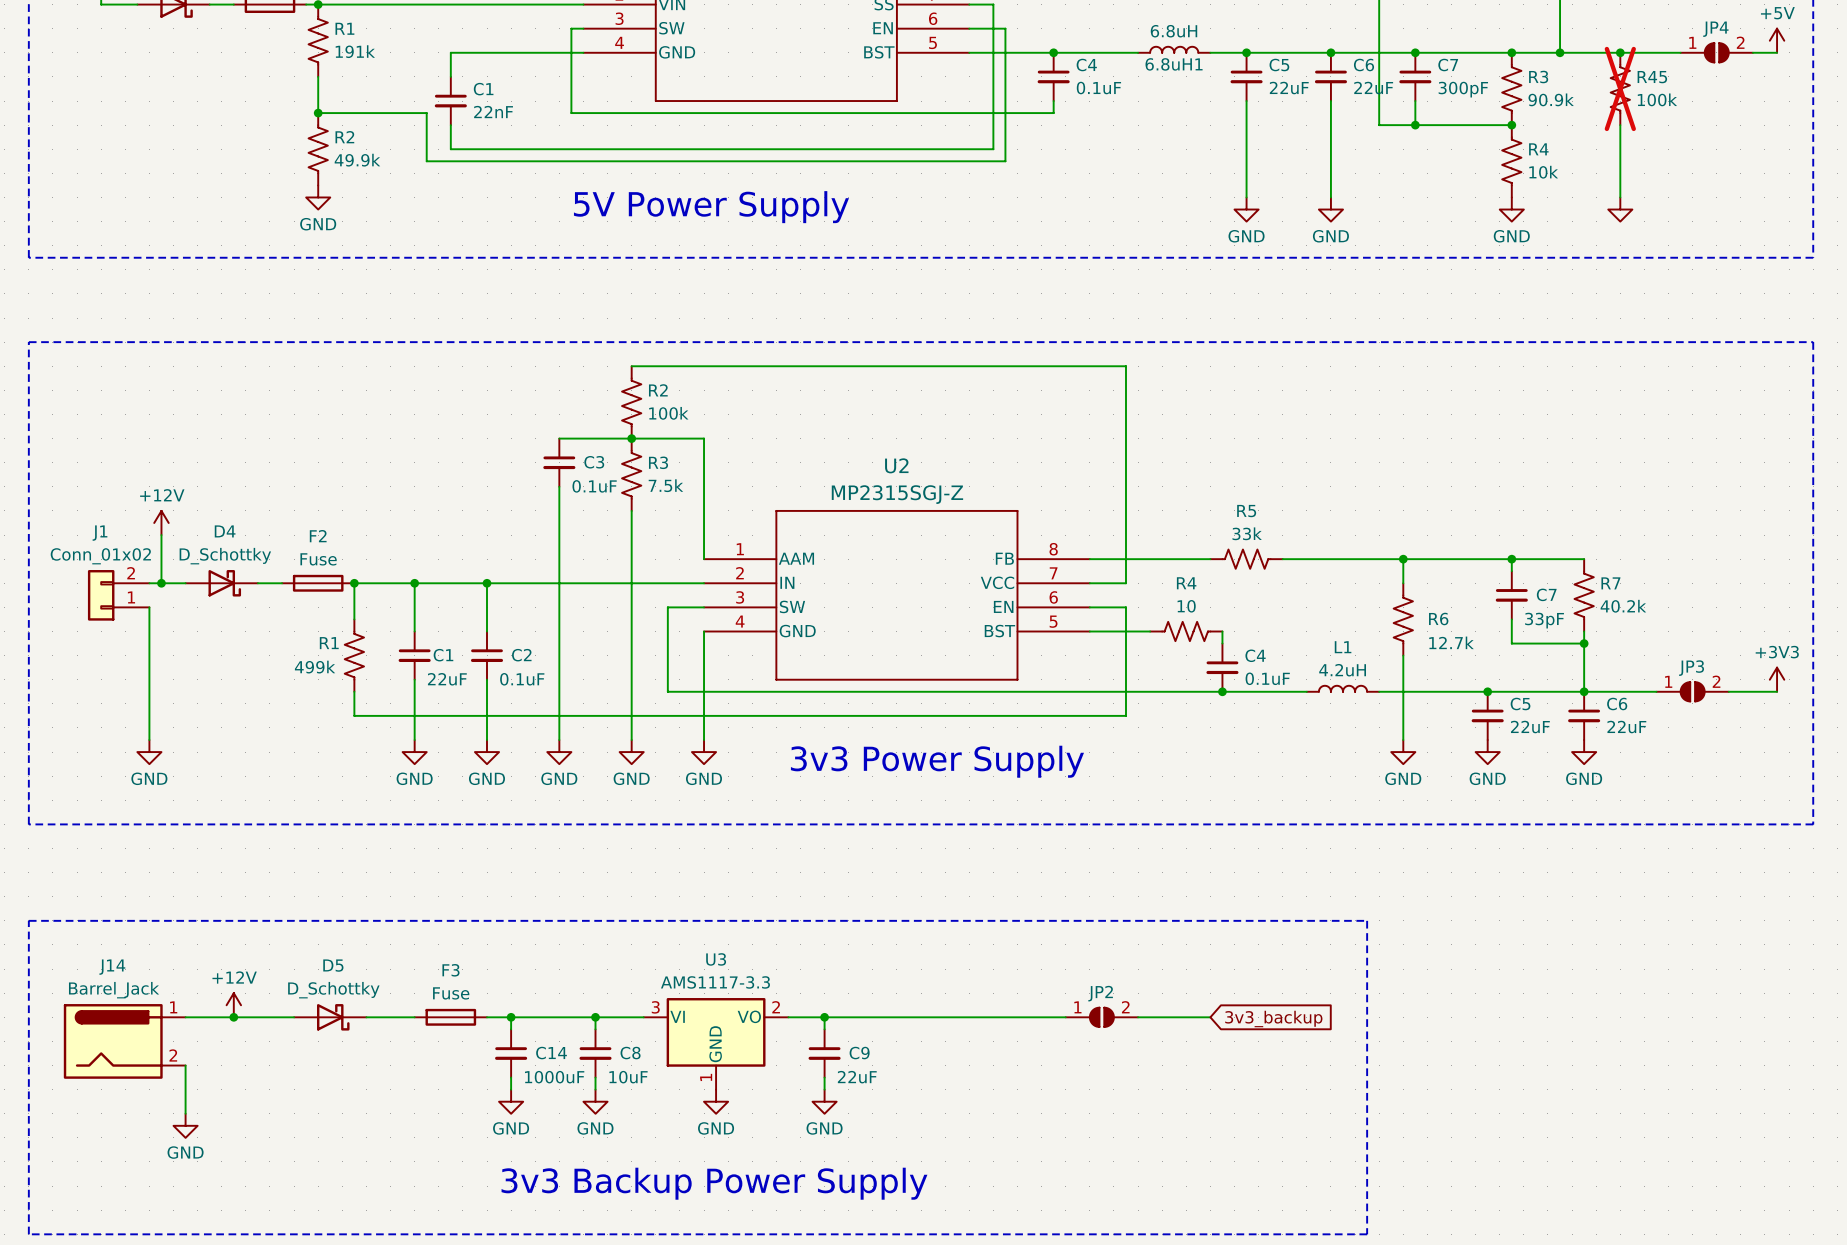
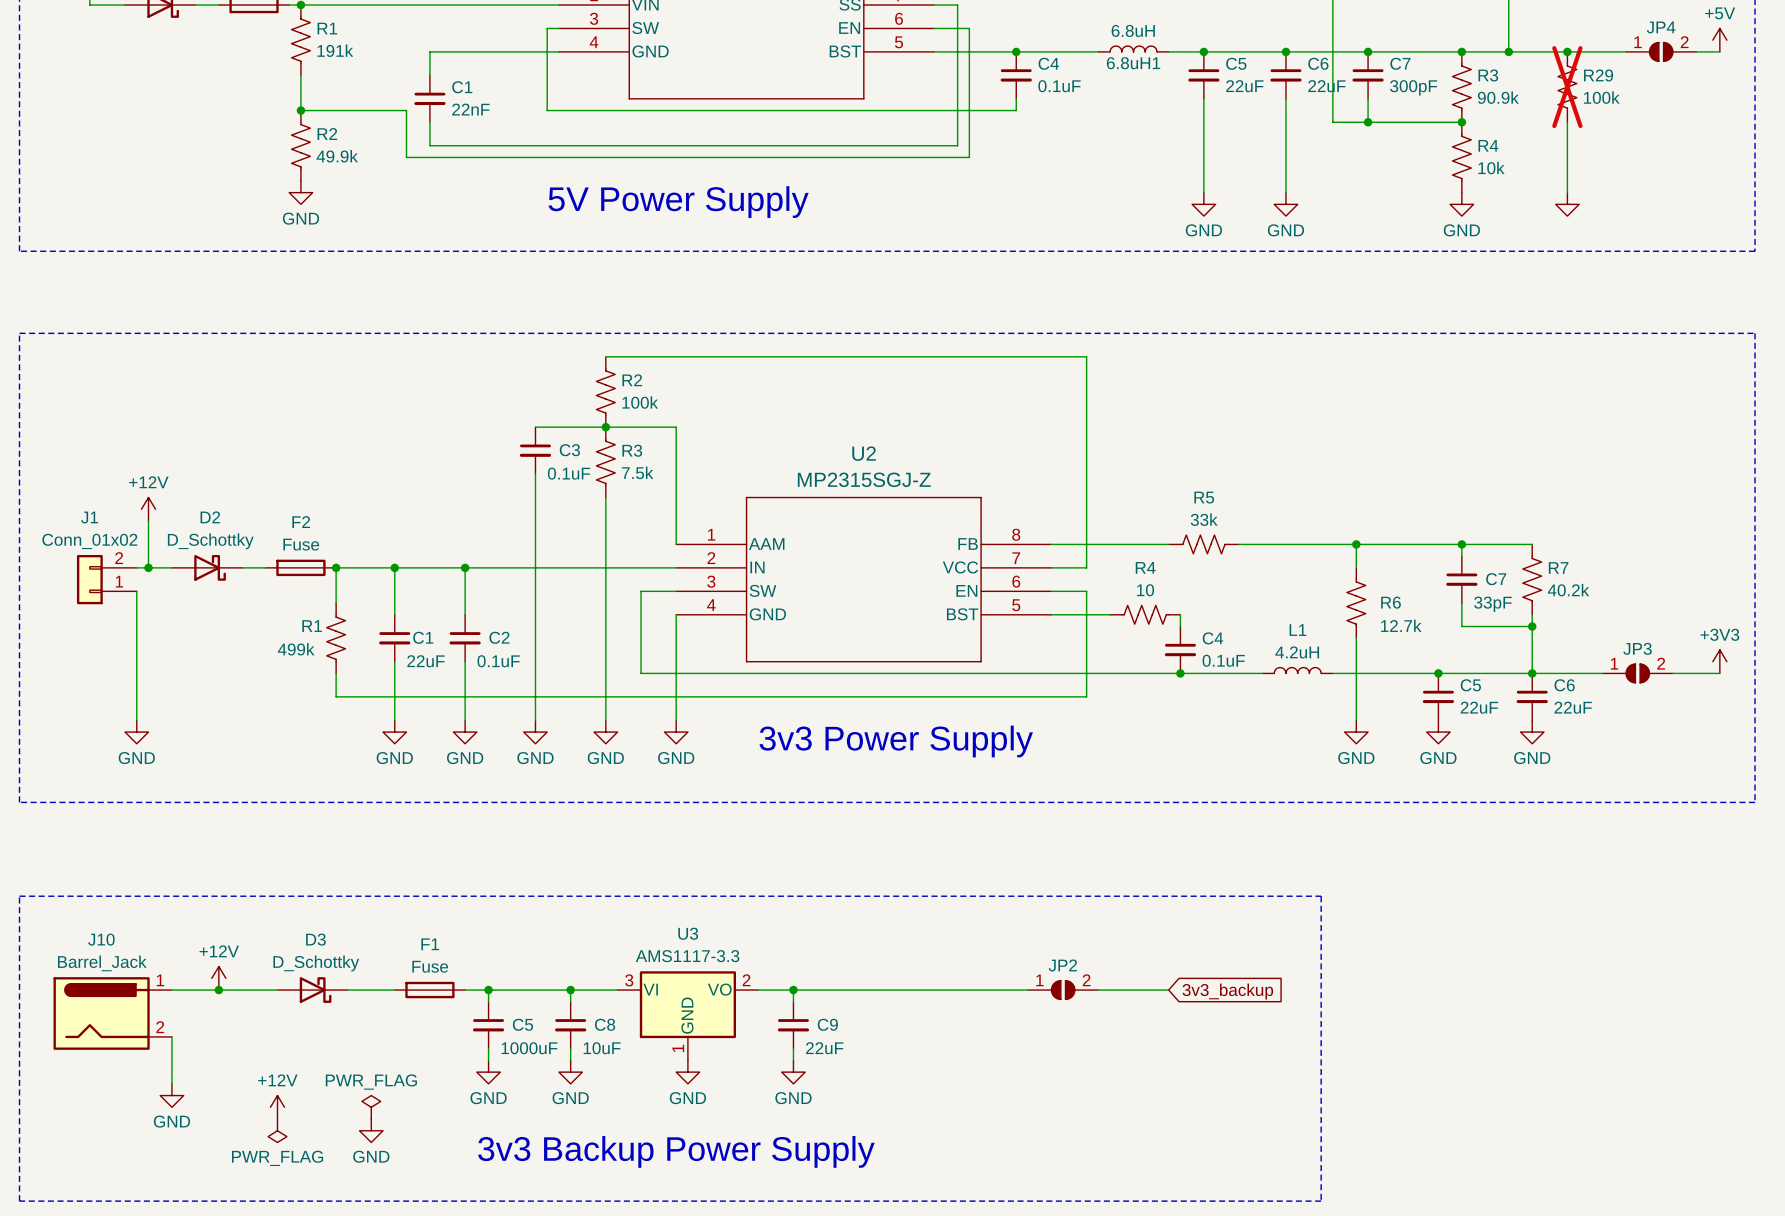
R45 name: R45 (1652, 77) -> R29 (1598, 75)
D4 name: D4 (225, 531) -> D2 (210, 517)
D5 name: D5 (333, 965) -> D3 (315, 939)
J14 name: J14 (112, 967) -> J10 (101, 939)
F3 name: F3 (450, 970) -> F1 (430, 944)
C14 name: C14 (551, 1053) -> C5 (522, 1024)
power symbol: none -> +12V (277, 1107)
power symbol: none -> PWR_FLAG (371, 1107)
power symbol: none -> PWR_FLAG (277, 1130)
power symbol: none -> GND (371, 1130)

